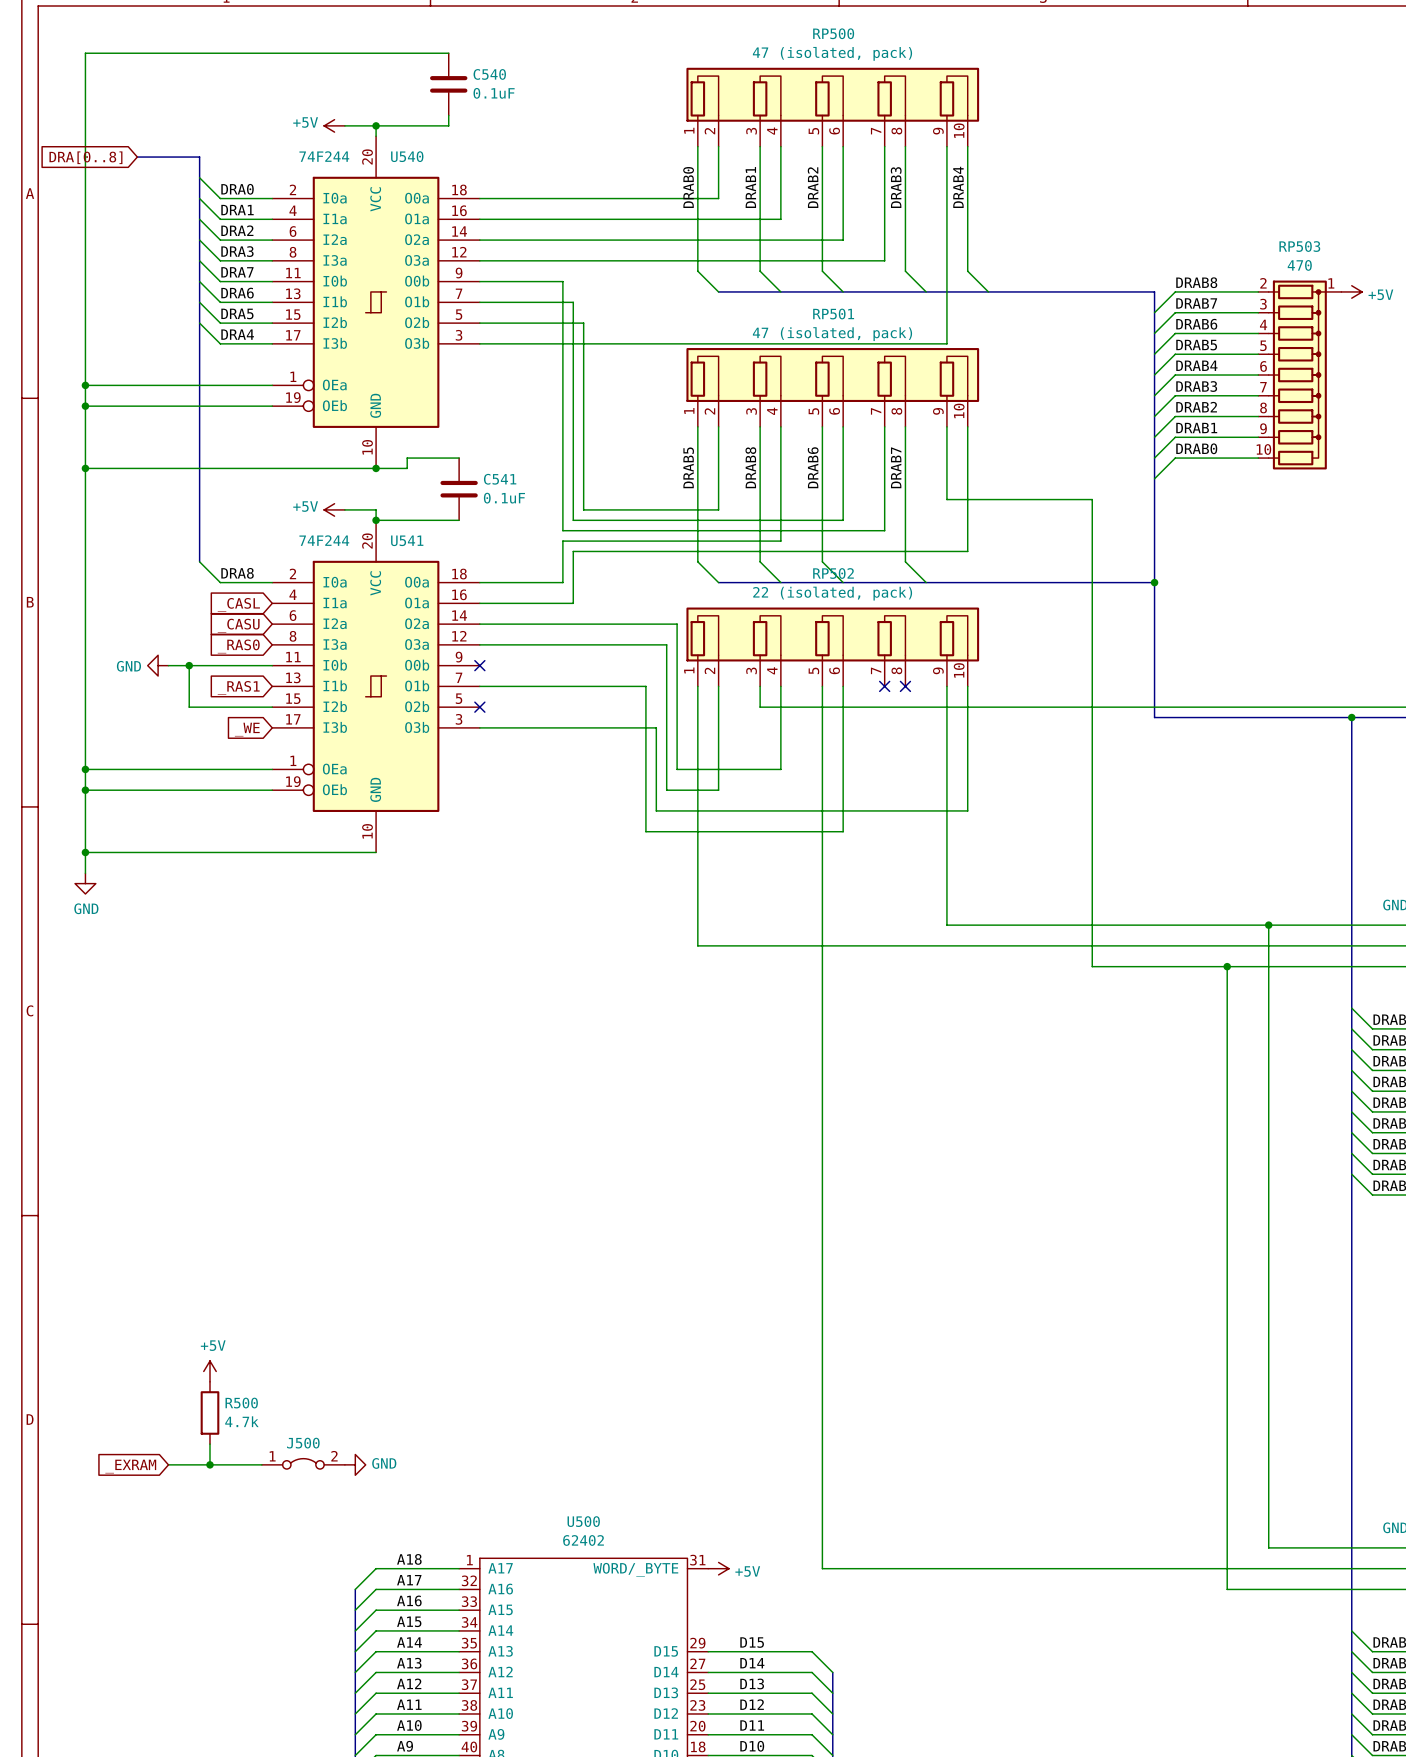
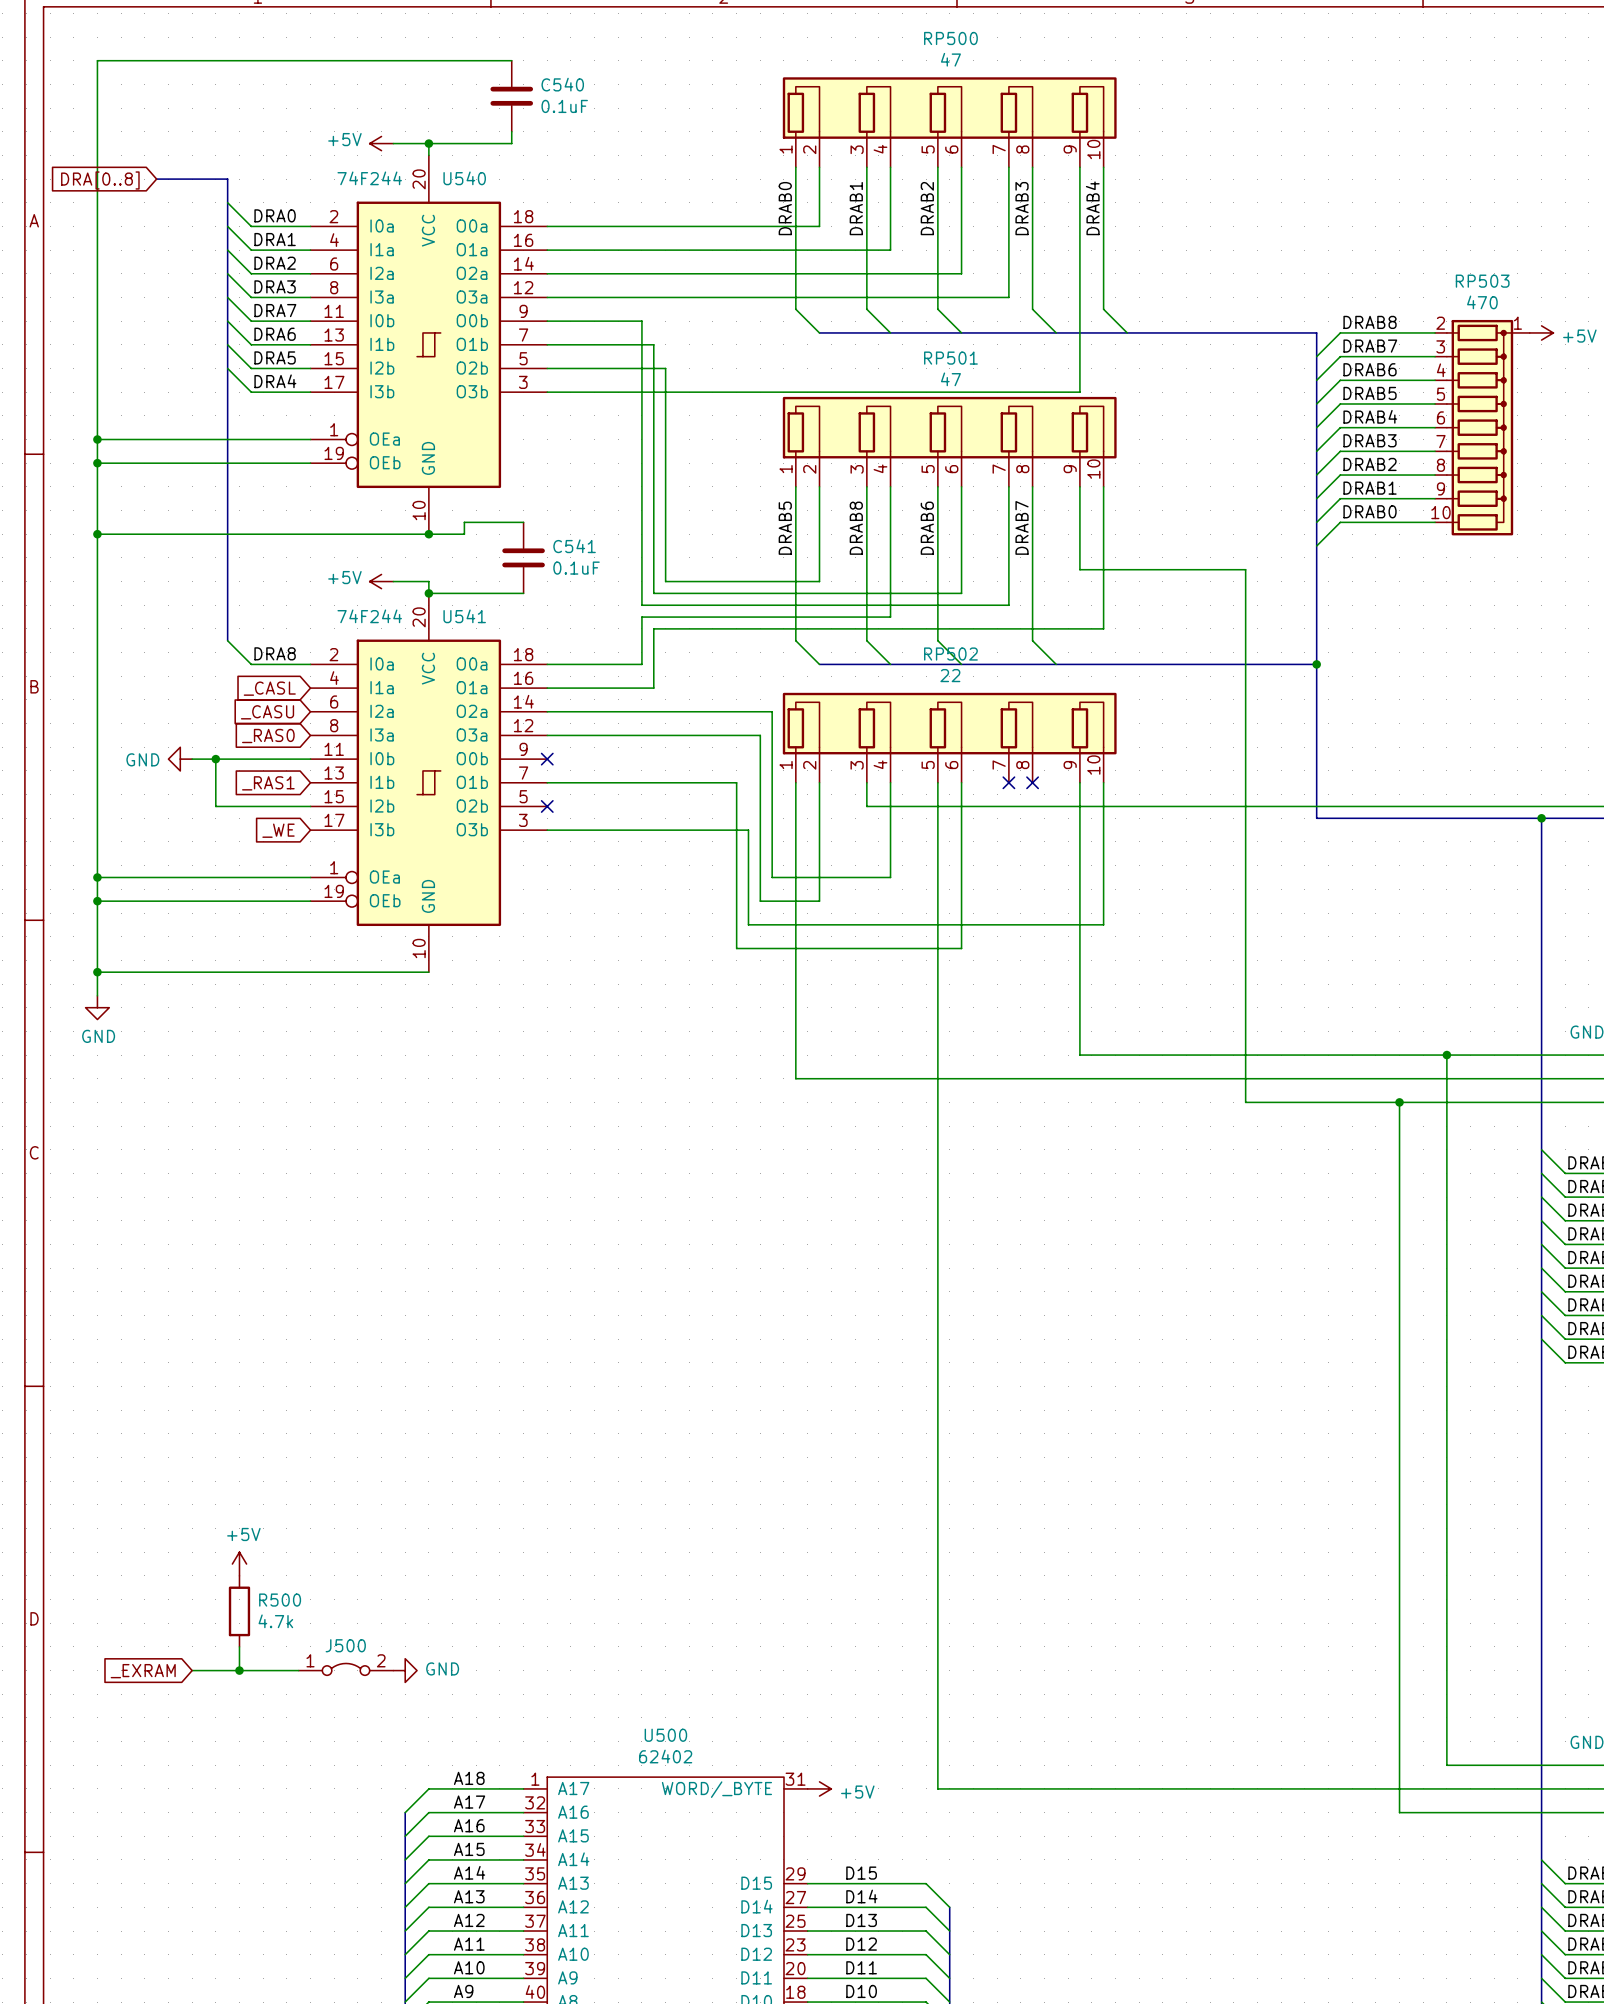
RP500 value: 47 (isolated, pack) (832, 53) -> 47 (950, 59)
RP501 value: 47 (isolated, pack) (832, 334) -> 47 (950, 379)
RP502 value: 22 (isolated, pack) (832, 593) -> 22 (950, 675)

